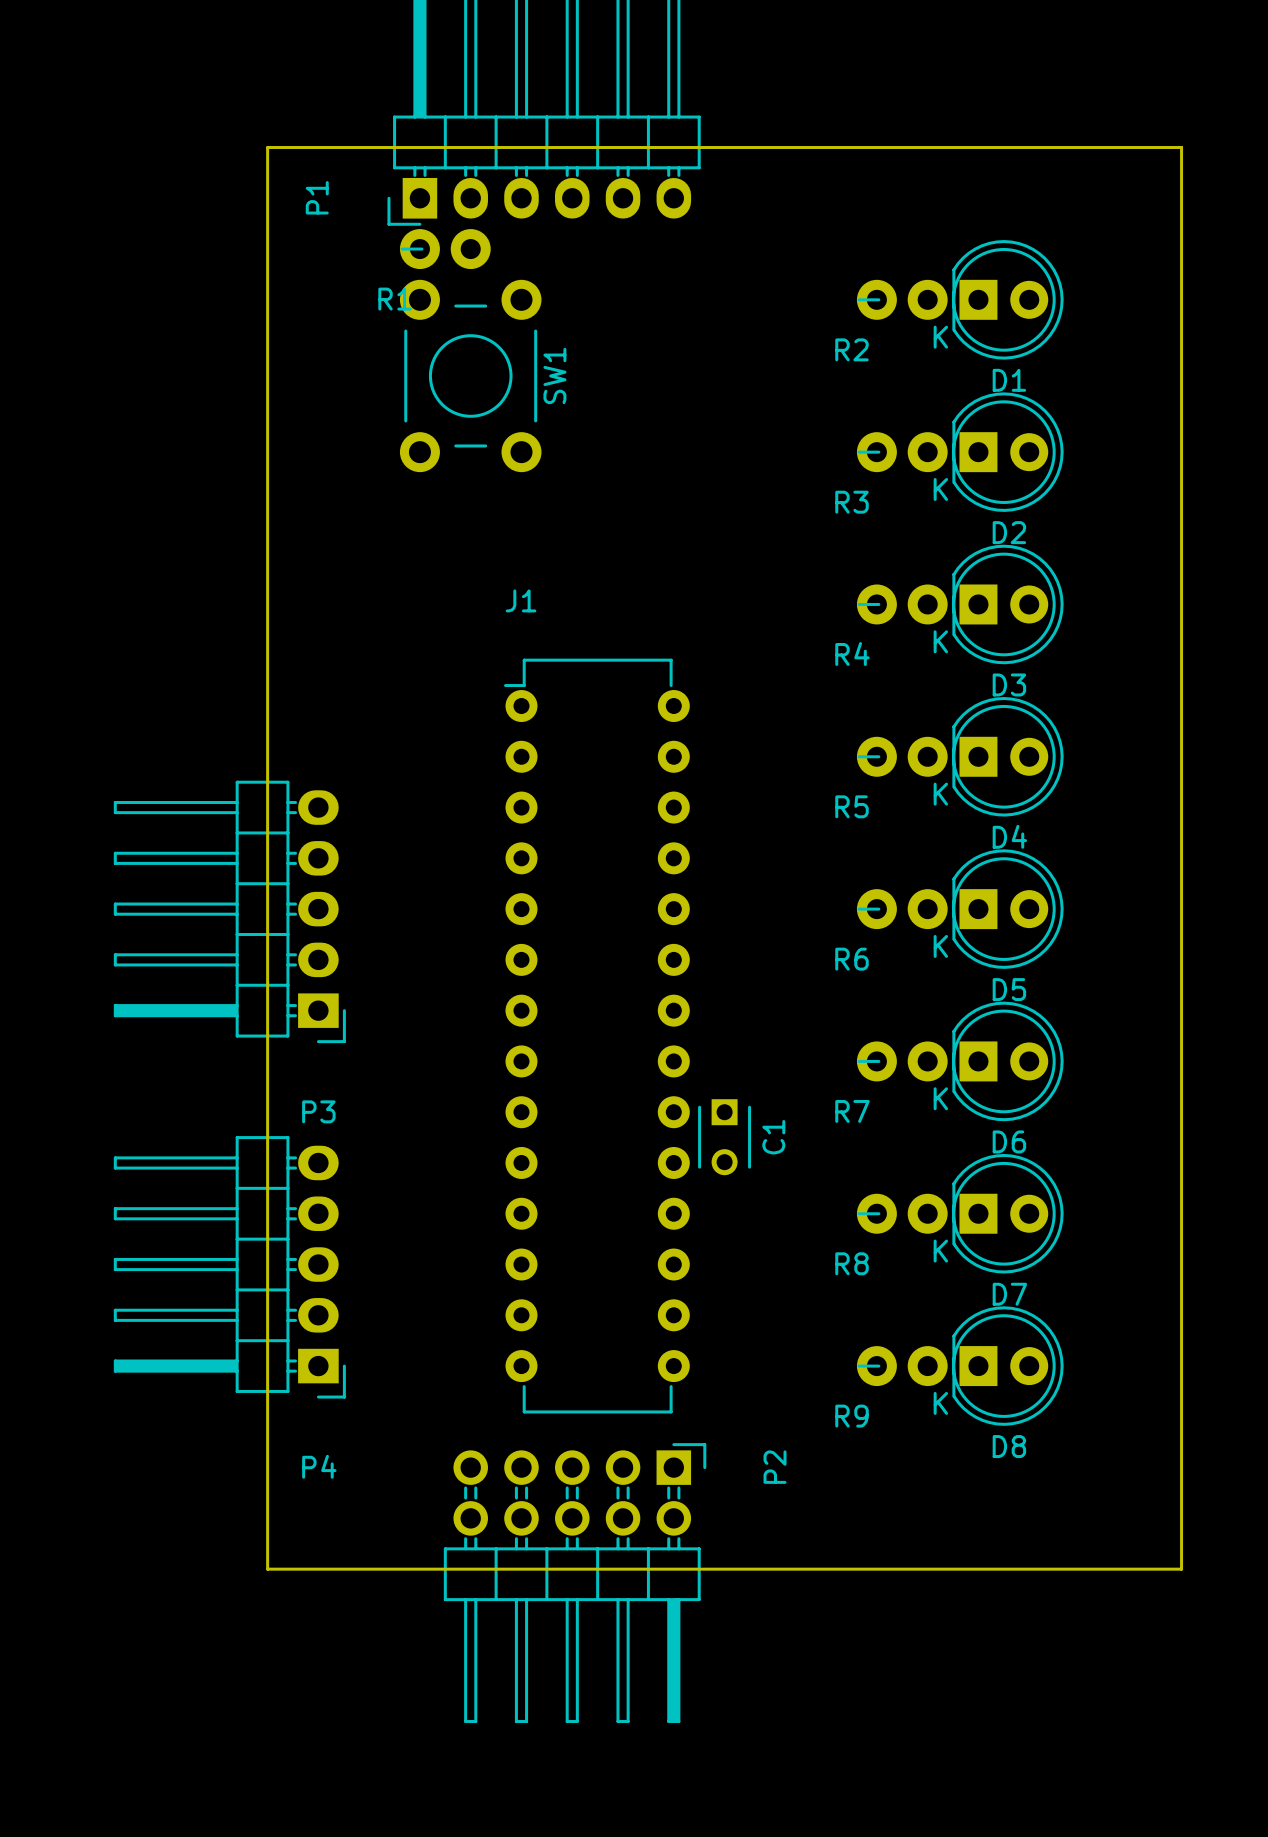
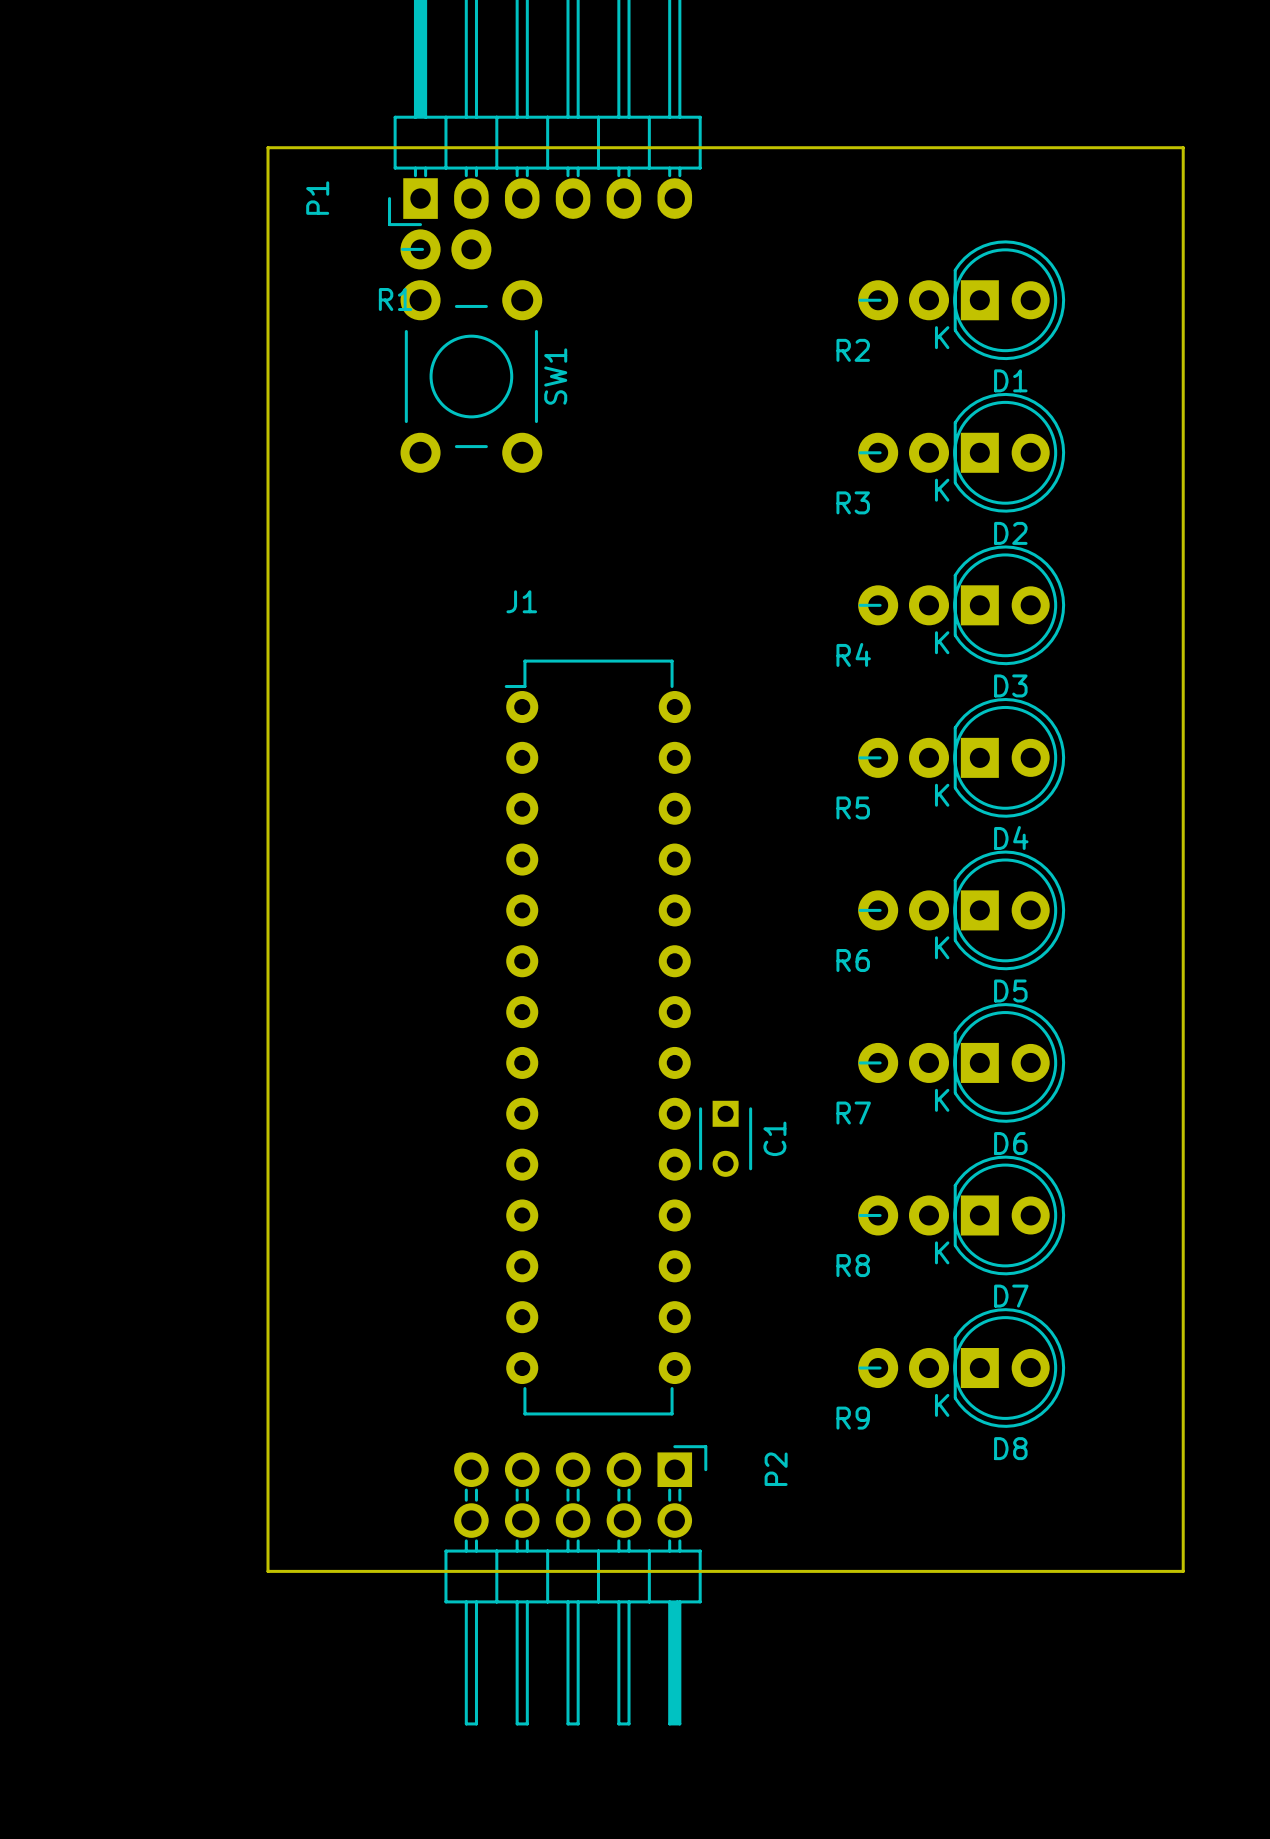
P3: (229, 911) -> none
P4: (229, 1267) -> none

